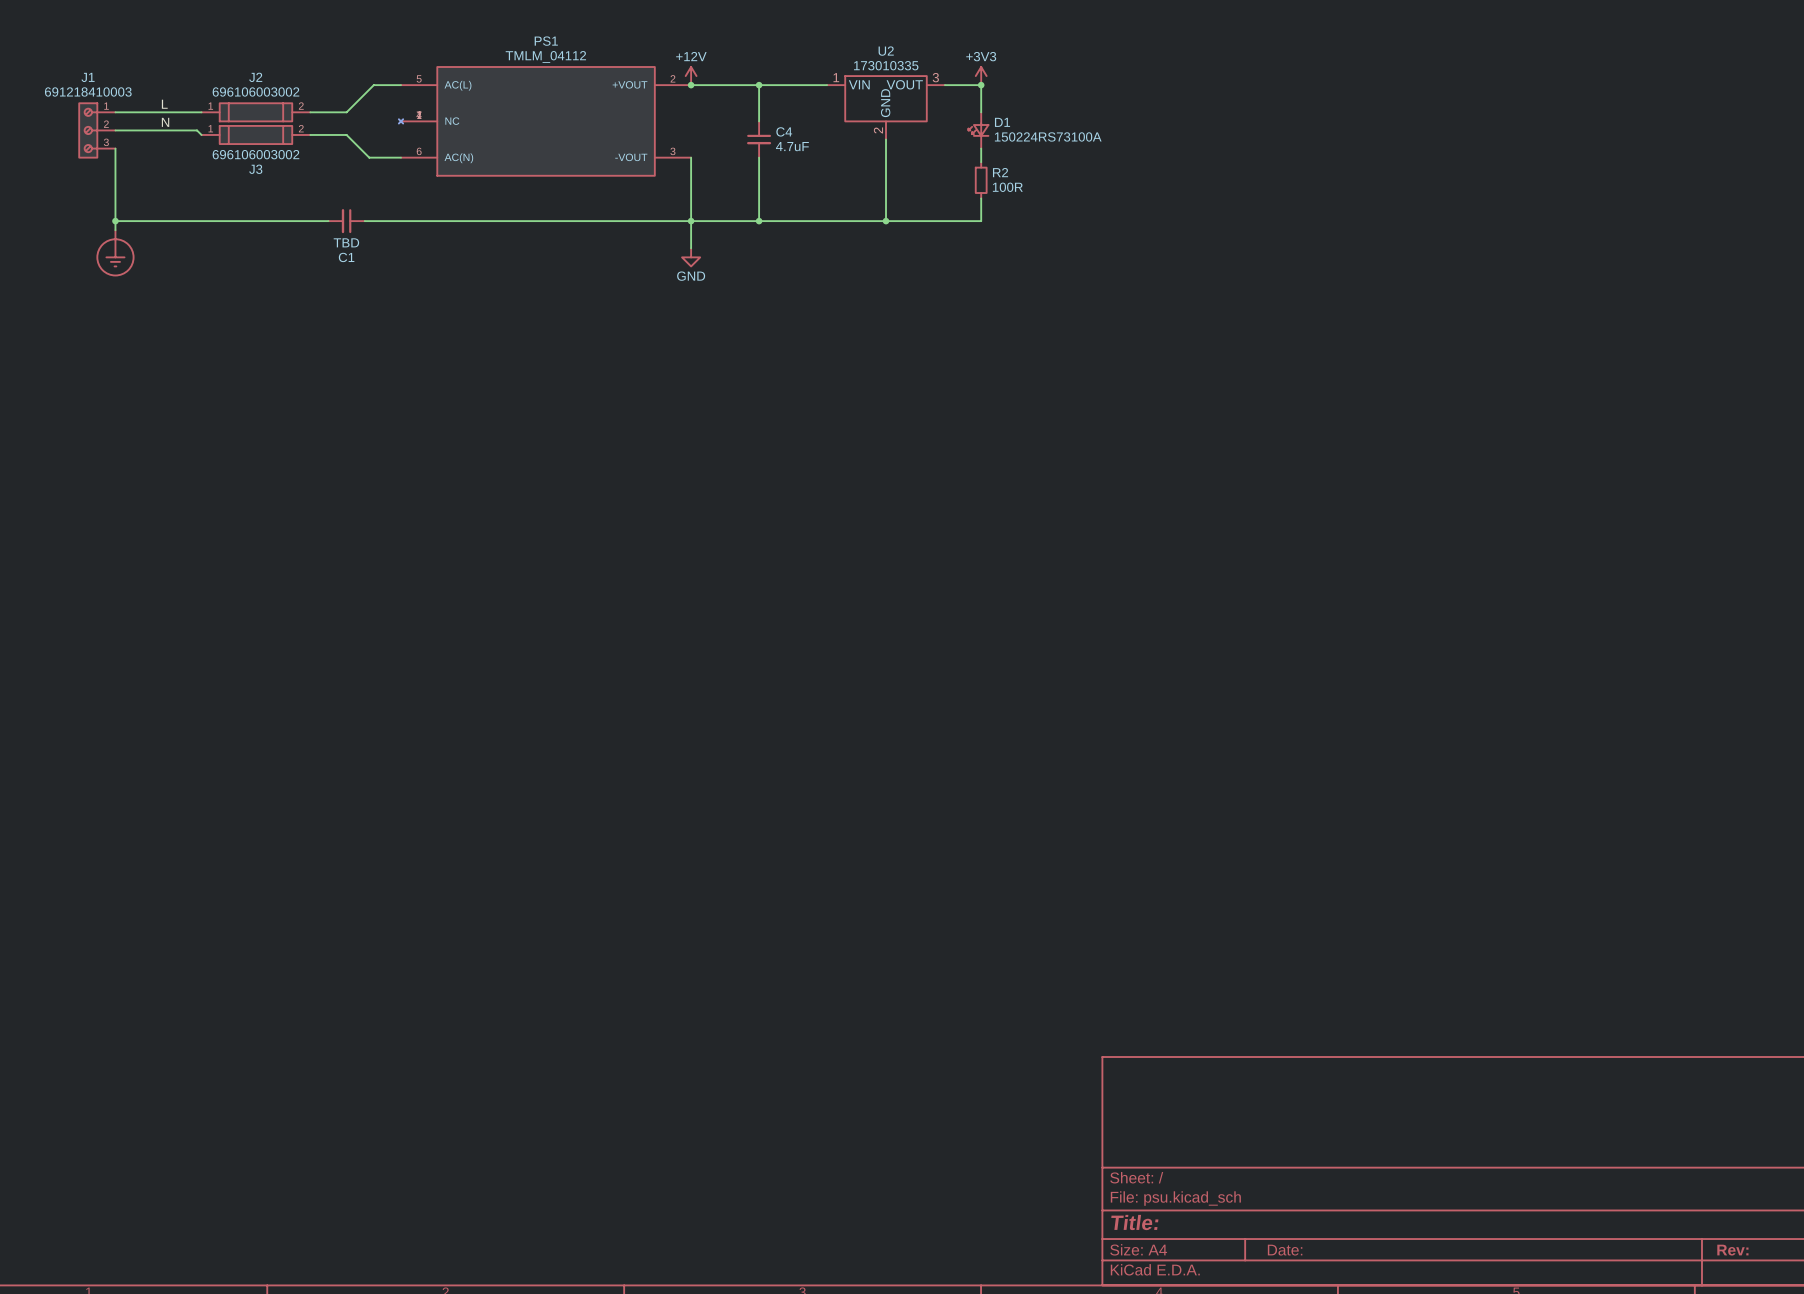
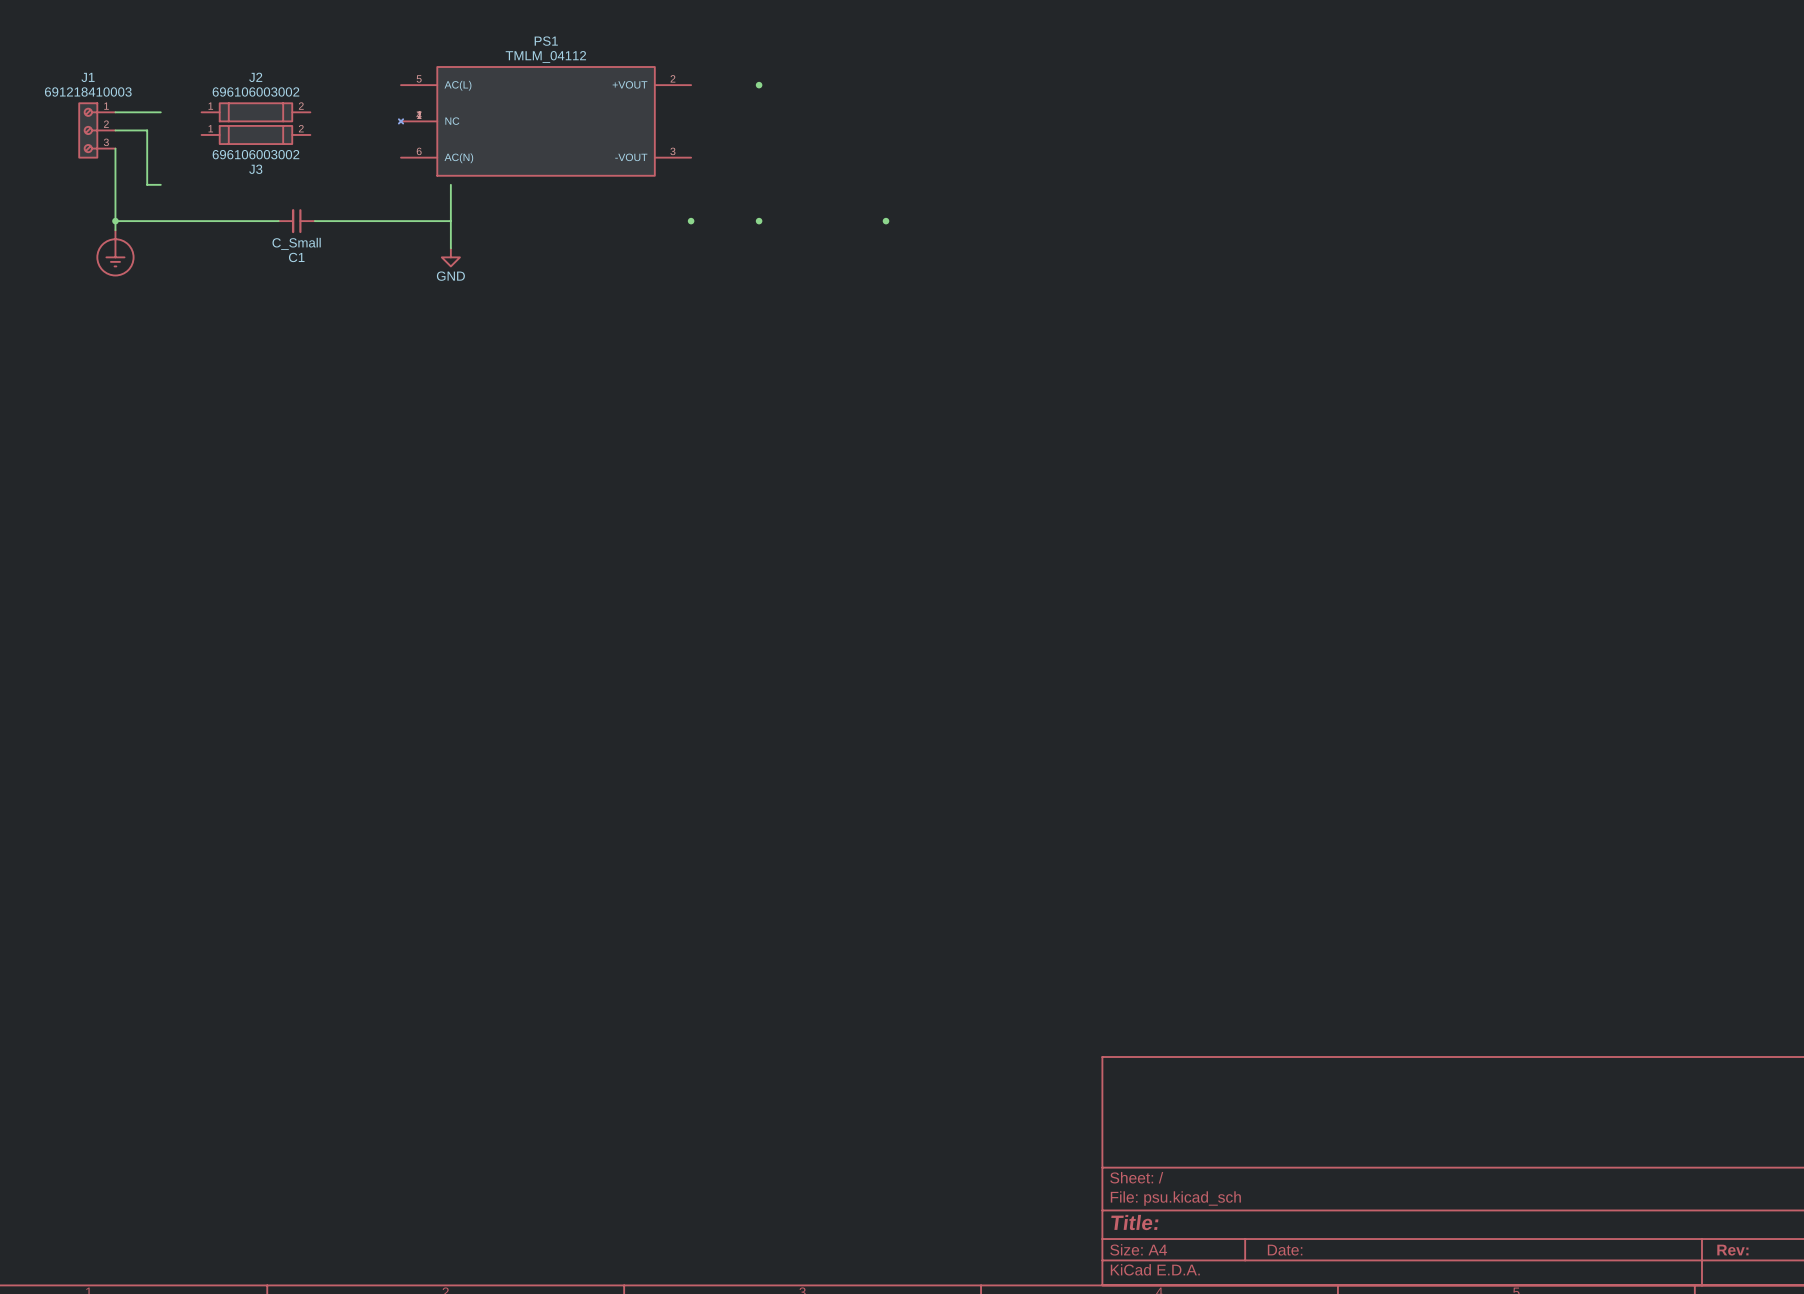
power symbol: +12V (691, 76) -> none
power symbol: +3V3 (981, 76) -> none
wire: (401, 85) (373, 85) (346, 112) (310, 112) -> none
wire: (691, 85) (827, 85) -> none
junction: (691, 85) -> none
wire: (759, 85) (759, 121) -> none
wire: (944, 85) (981, 85) (981, 112) -> none
junction: (981, 85) -> none
label: L (164, 104) -> none
U2: 173010335 (886, 107) -> none
wire: (160, 112) (201, 112) -> none
label: N (165, 122) -> none
wire: (147, 130) (197, 130) (201, 134) -> (147, 130) (147, 184) (160, 184)
D1: 150224RS73100A (978, 130) -> none
wire: (310, 134) (346, 134) (369, 157) (401, 157) -> none
C4: 4.7uF (759, 139) -> none
wire: (886, 139) (886, 221) -> none
wire: (981, 148) (981, 162) -> none
wire: (691, 157) (691, 248) -> none
wire: (759, 157) (759, 221) -> none
R2: 100R (981, 180) -> none
wire: none -> (450, 184) (450, 248)
wire: (981, 198) (981, 221) (450, 221) -> none
C1 position: (346, 221) -> (296, 221)
C1 value: TBD (346, 242) -> C_Small (296, 243)
power symbol: none -> GND (450, 257)
power symbol: GND (691, 257) -> none

